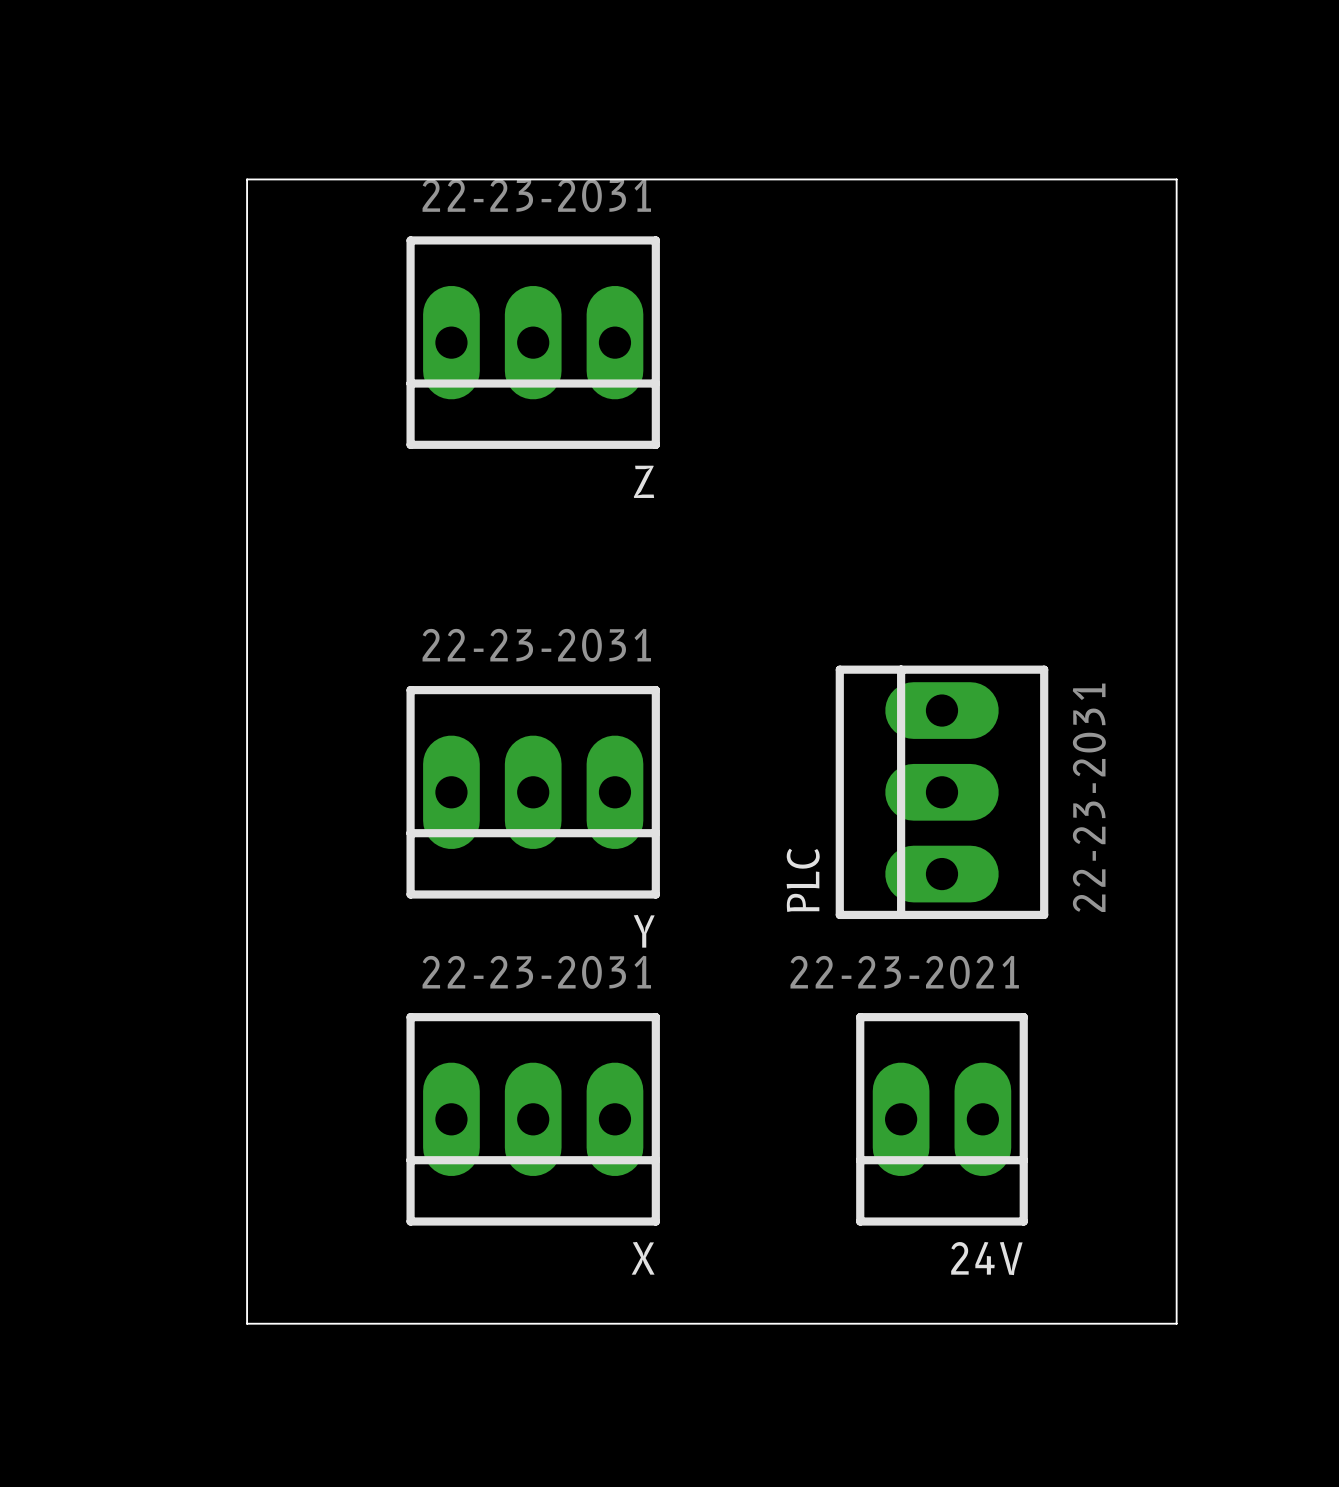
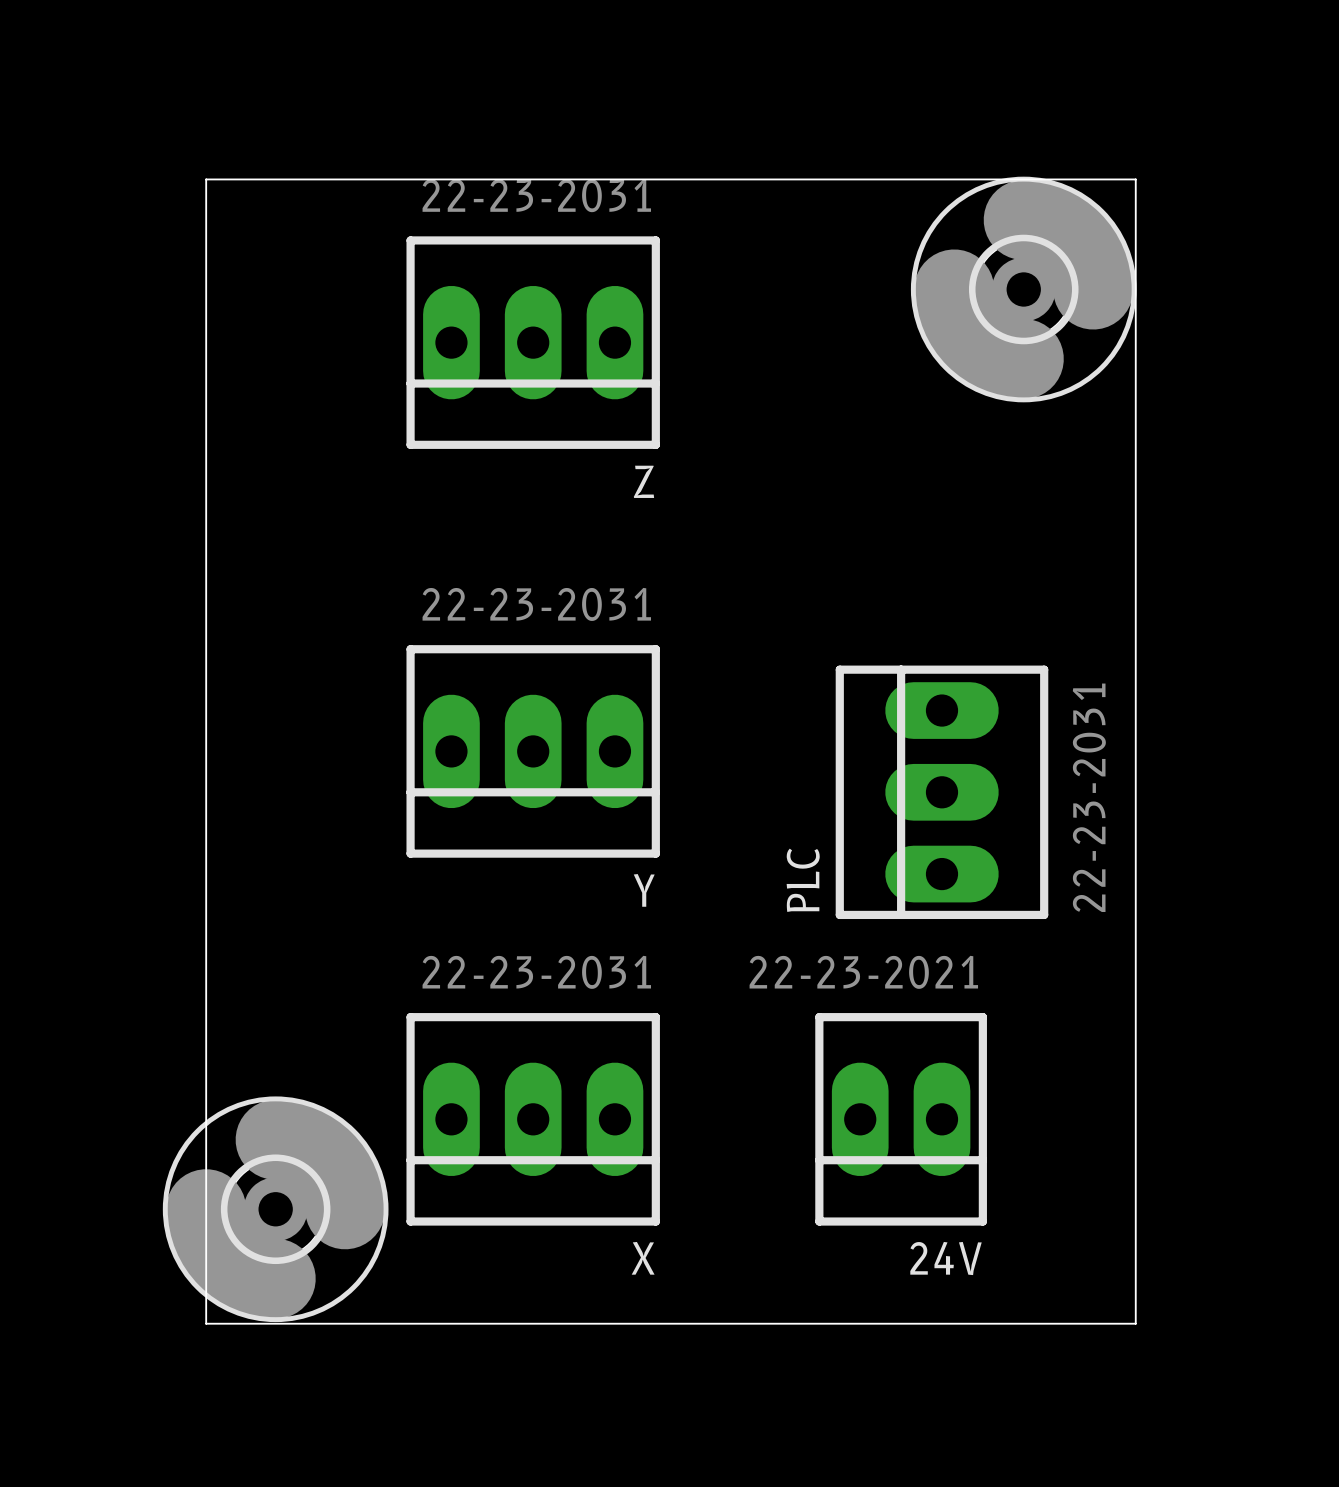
board edge: (247, 179) (247, 1323) -> (247, 179) (206, 179) (206, 1323) (247, 1323)
board edge: (1135, 179) (1176, 179) (1176, 1323) (1135, 1323) -> (1135, 179) (1135, 1323)
part: none -> (1023, 289)
Y position: (533, 792) -> (533, 751)
24V position: (941, 1119) -> (901, 1119)
part: none -> (275, 1209)

